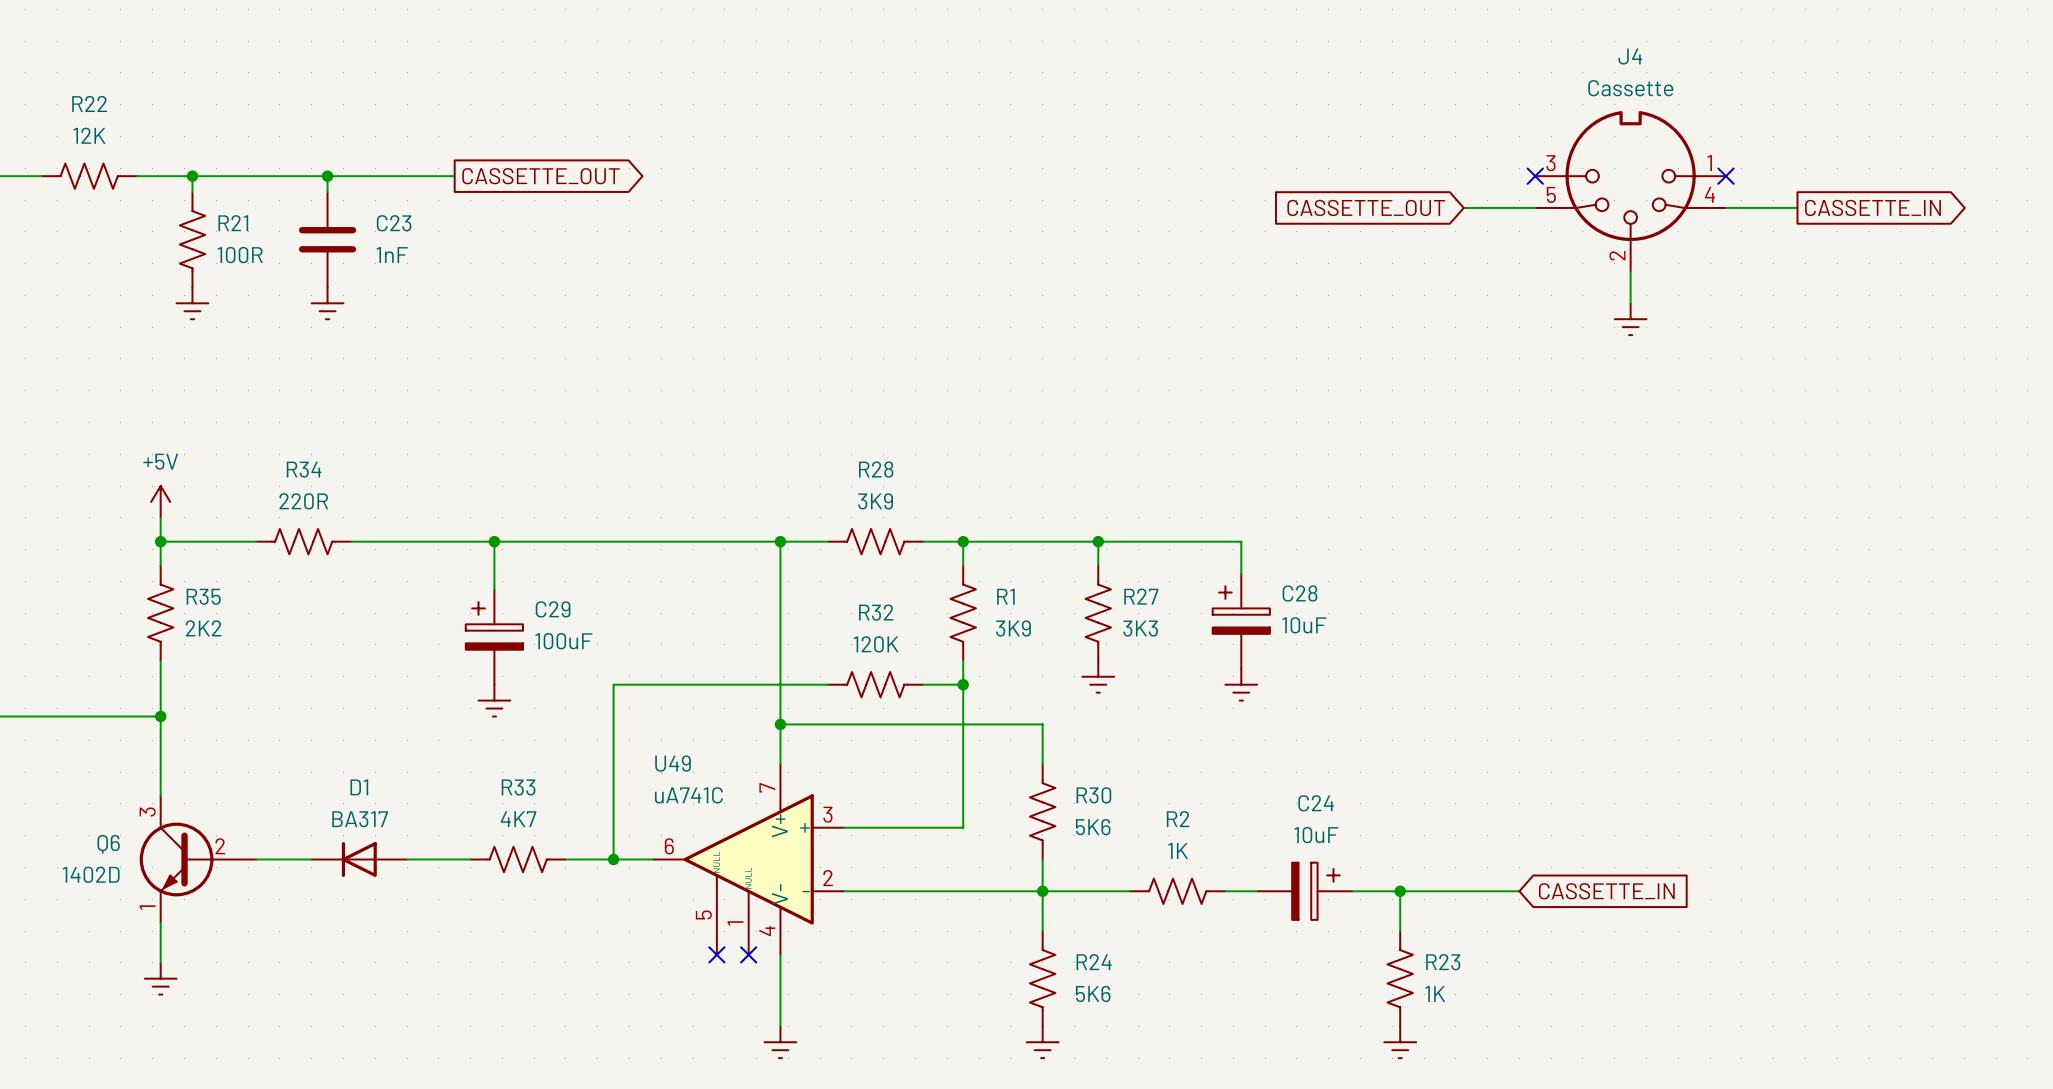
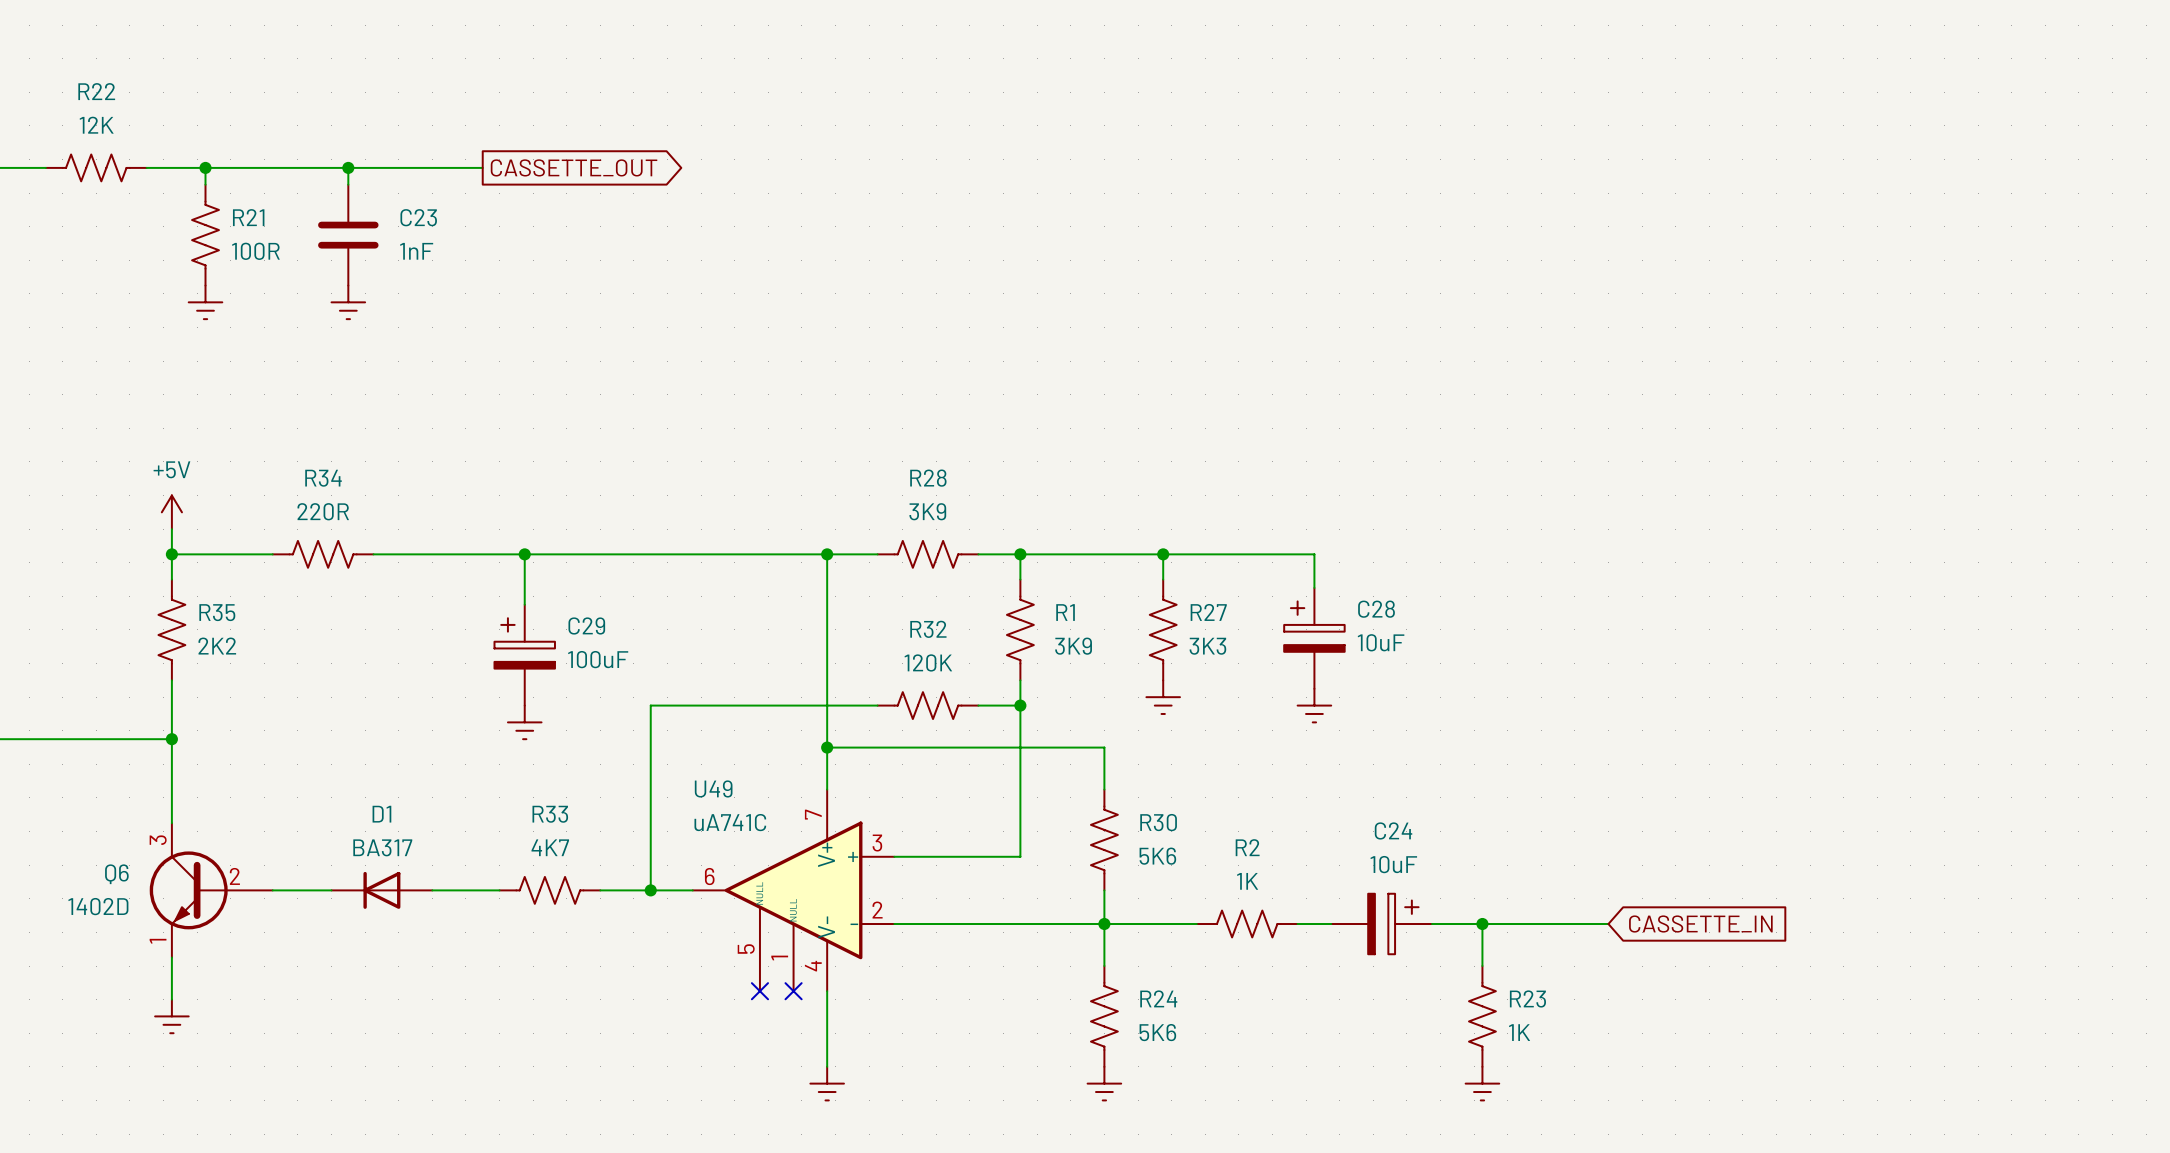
no-connect mark: (1535, 176) -> none
no-connect mark: (1725, 176) -> none
J4: Cassette (1630, 191) -> none
global label: CASSETTE_OUT (1366, 207) -> none
wire: (1463, 207) (1535, 207) -> none
wire: (1725, 207) (1797, 207) -> none
global label: CASSETTE_IN (1872, 207) -> none
wire: (1630, 271) (1630, 303) -> none
power symbol: (1630, 319) -> none

